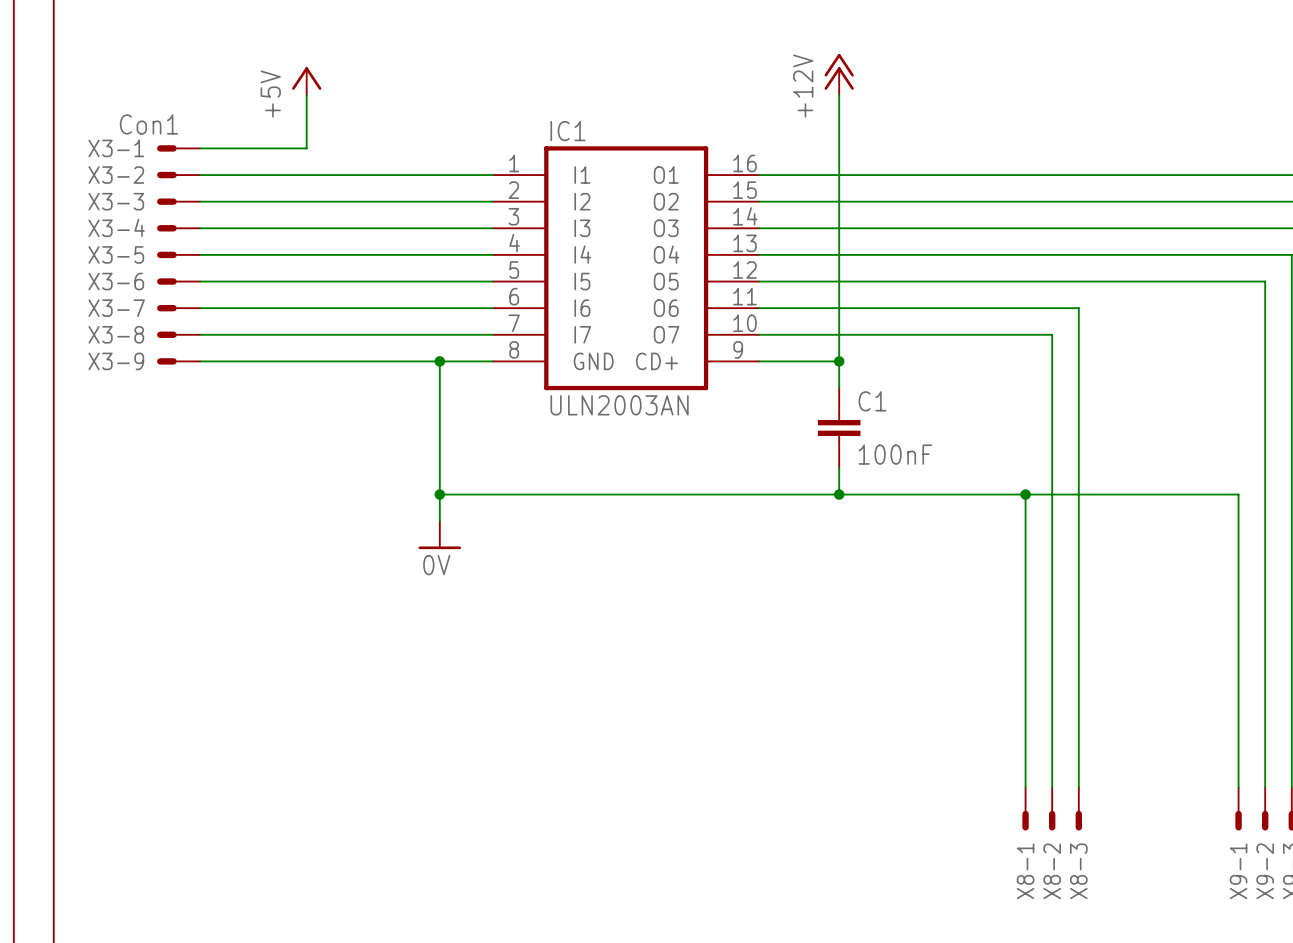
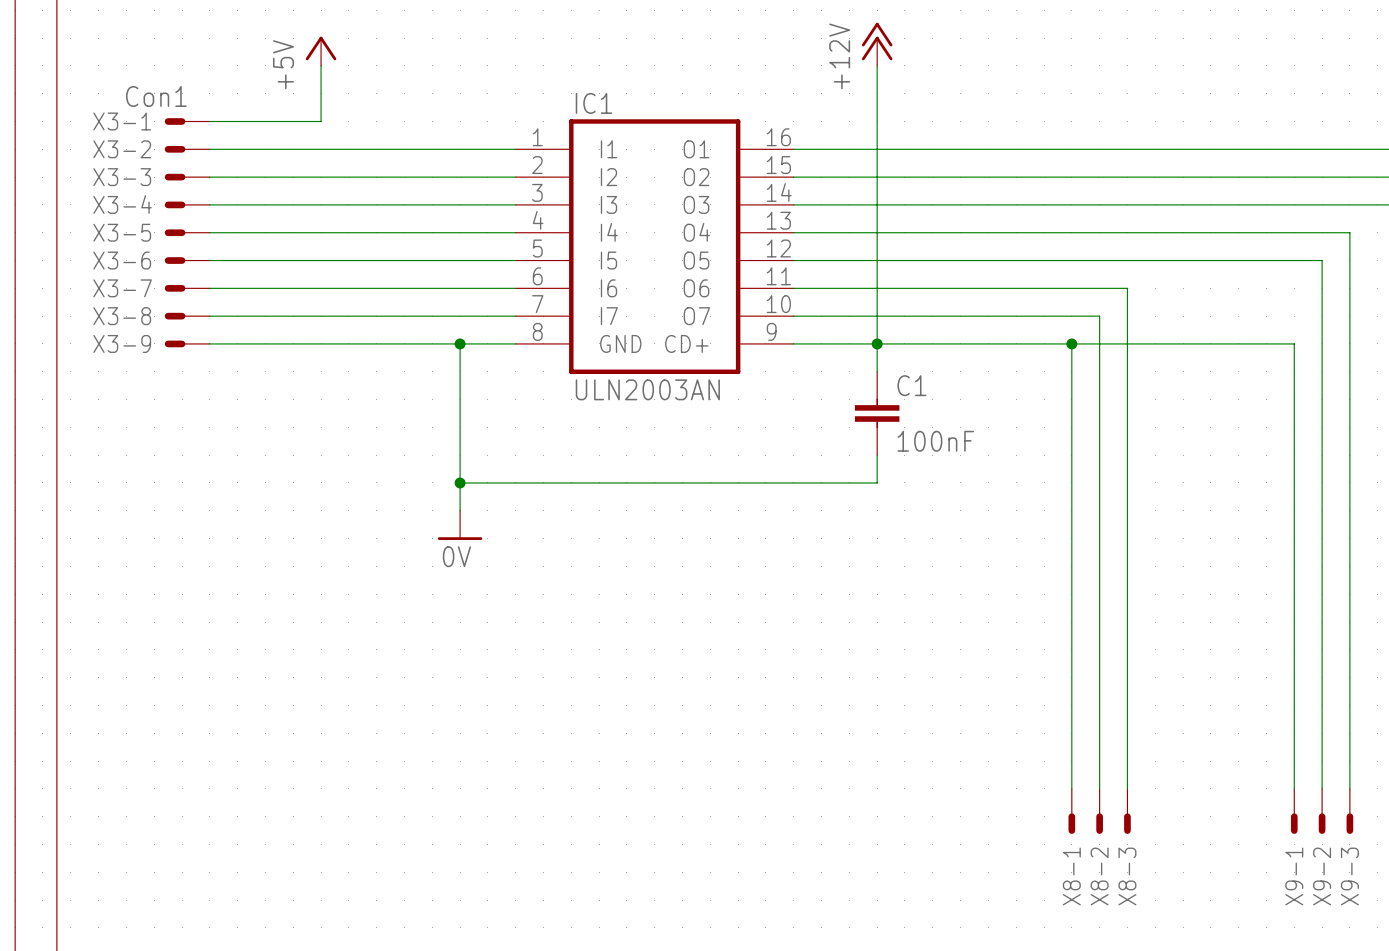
wire: none -> (1071, 343) (1071, 482)
junction: none -> (1071, 343)
wire: (839, 494) (1238, 494) -> (877, 343) (1294, 343) (1294, 482)
junction: (839, 494) -> none
junction: (1025, 494) -> none

